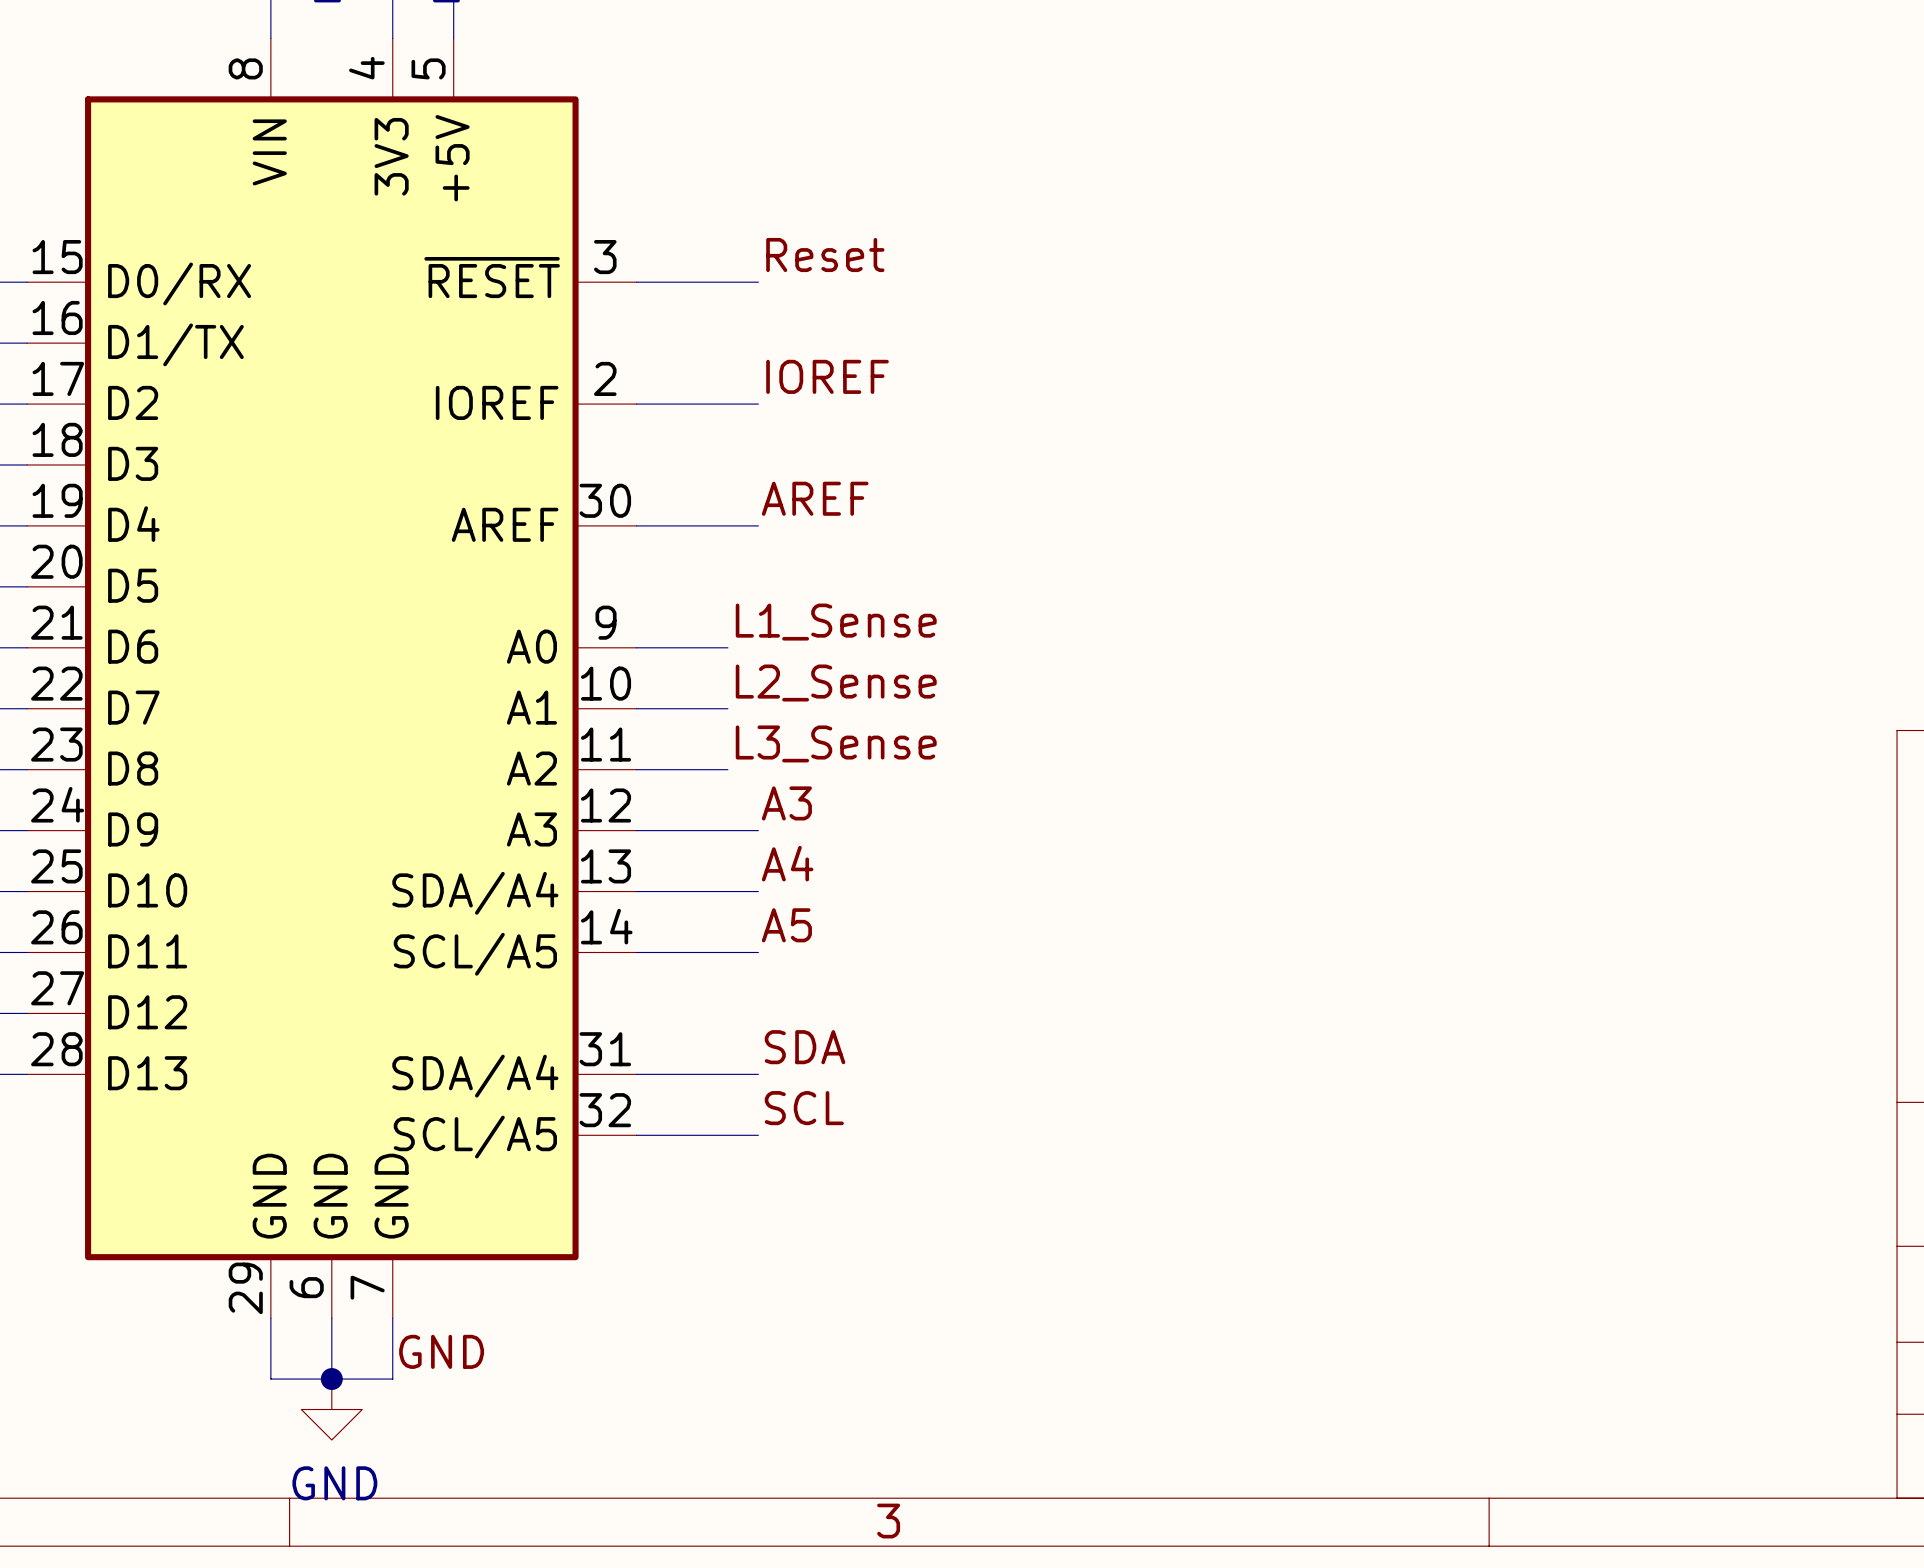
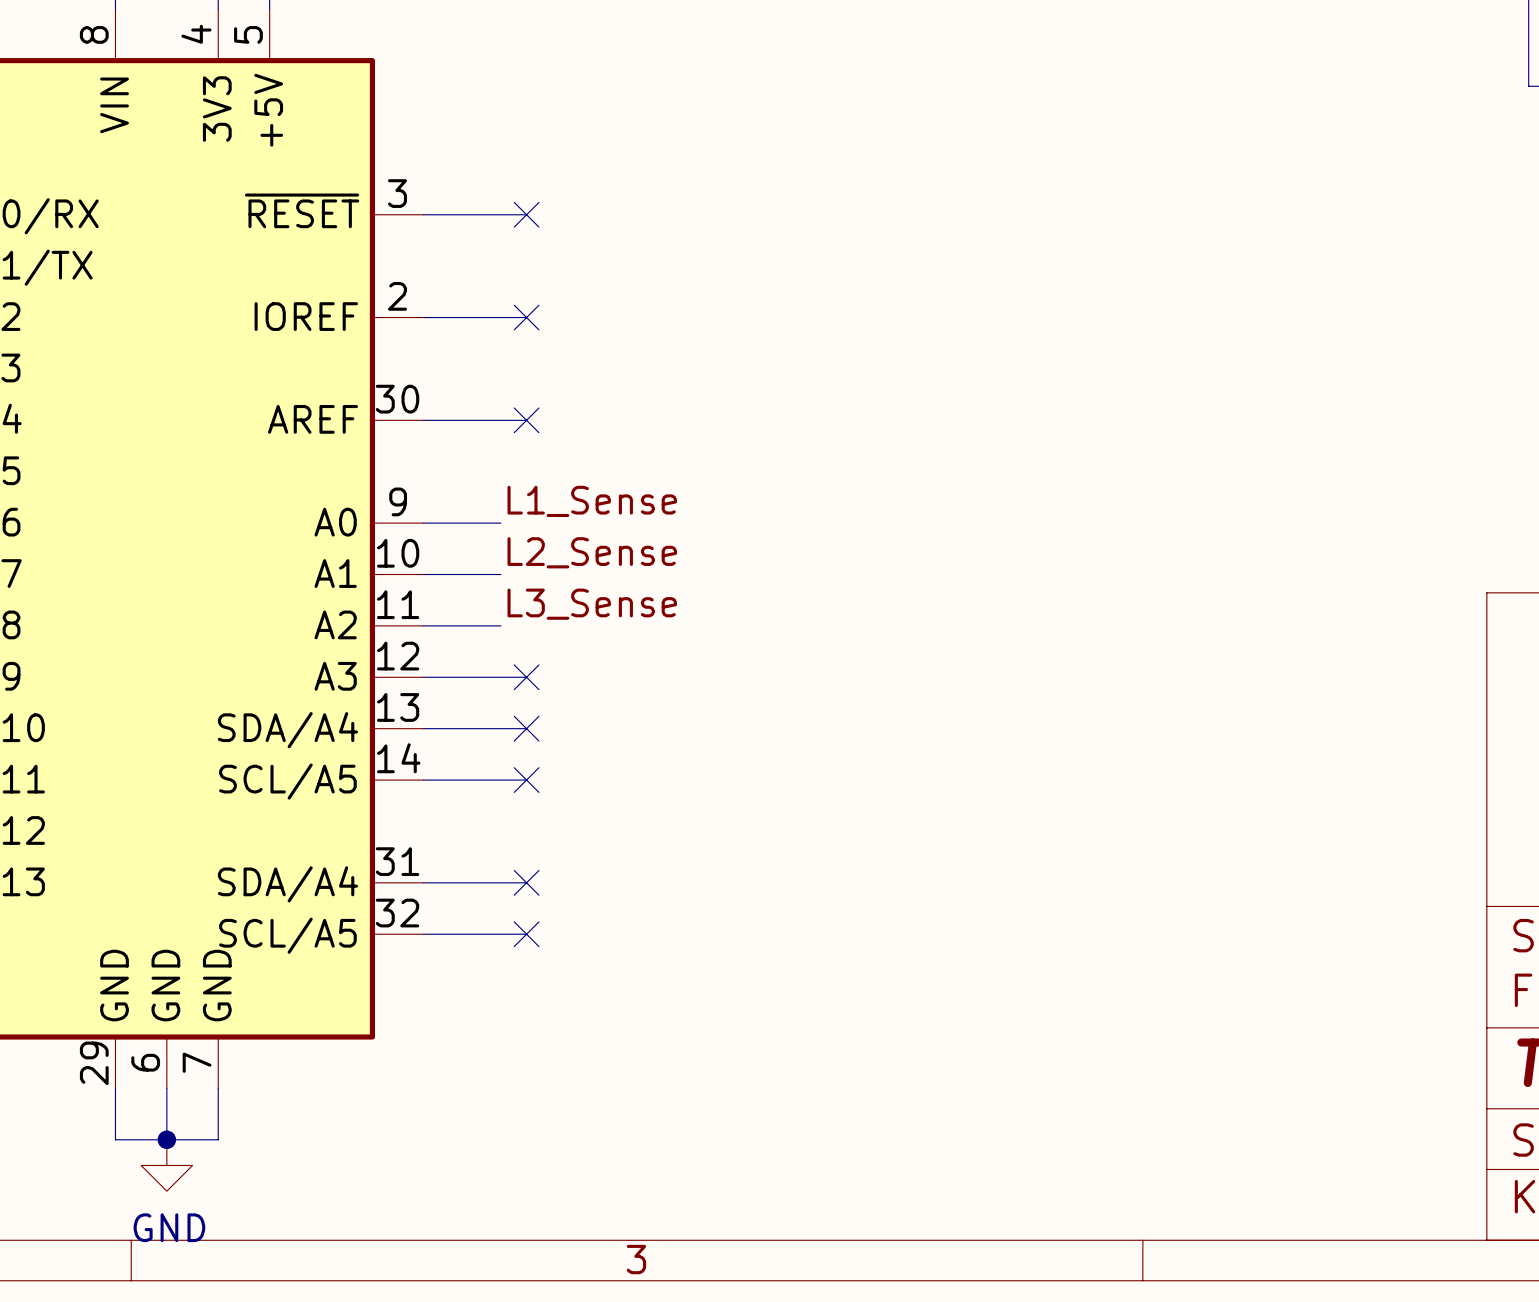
label: Reset (825, 255) -> none
no-connect mark: none -> (526, 214)
label: IOREF (827, 376) -> none
no-connect mark: none -> (526, 317)
label: AREF (815, 498) -> none
no-connect mark: none -> (526, 420)
label: A3 (786, 803) -> none
no-connect mark: none -> (526, 677)
label: A4 (787, 863) -> none
no-connect mark: none -> (526, 728)
label: A5 (786, 925) -> none
no-connect mark: none -> (526, 780)
label: SDA (805, 1047) -> none
no-connect mark: none -> (526, 882)
label: SCL (804, 1108) -> none
no-connect mark: none -> (526, 934)
label: GND (441, 1351) -> none

